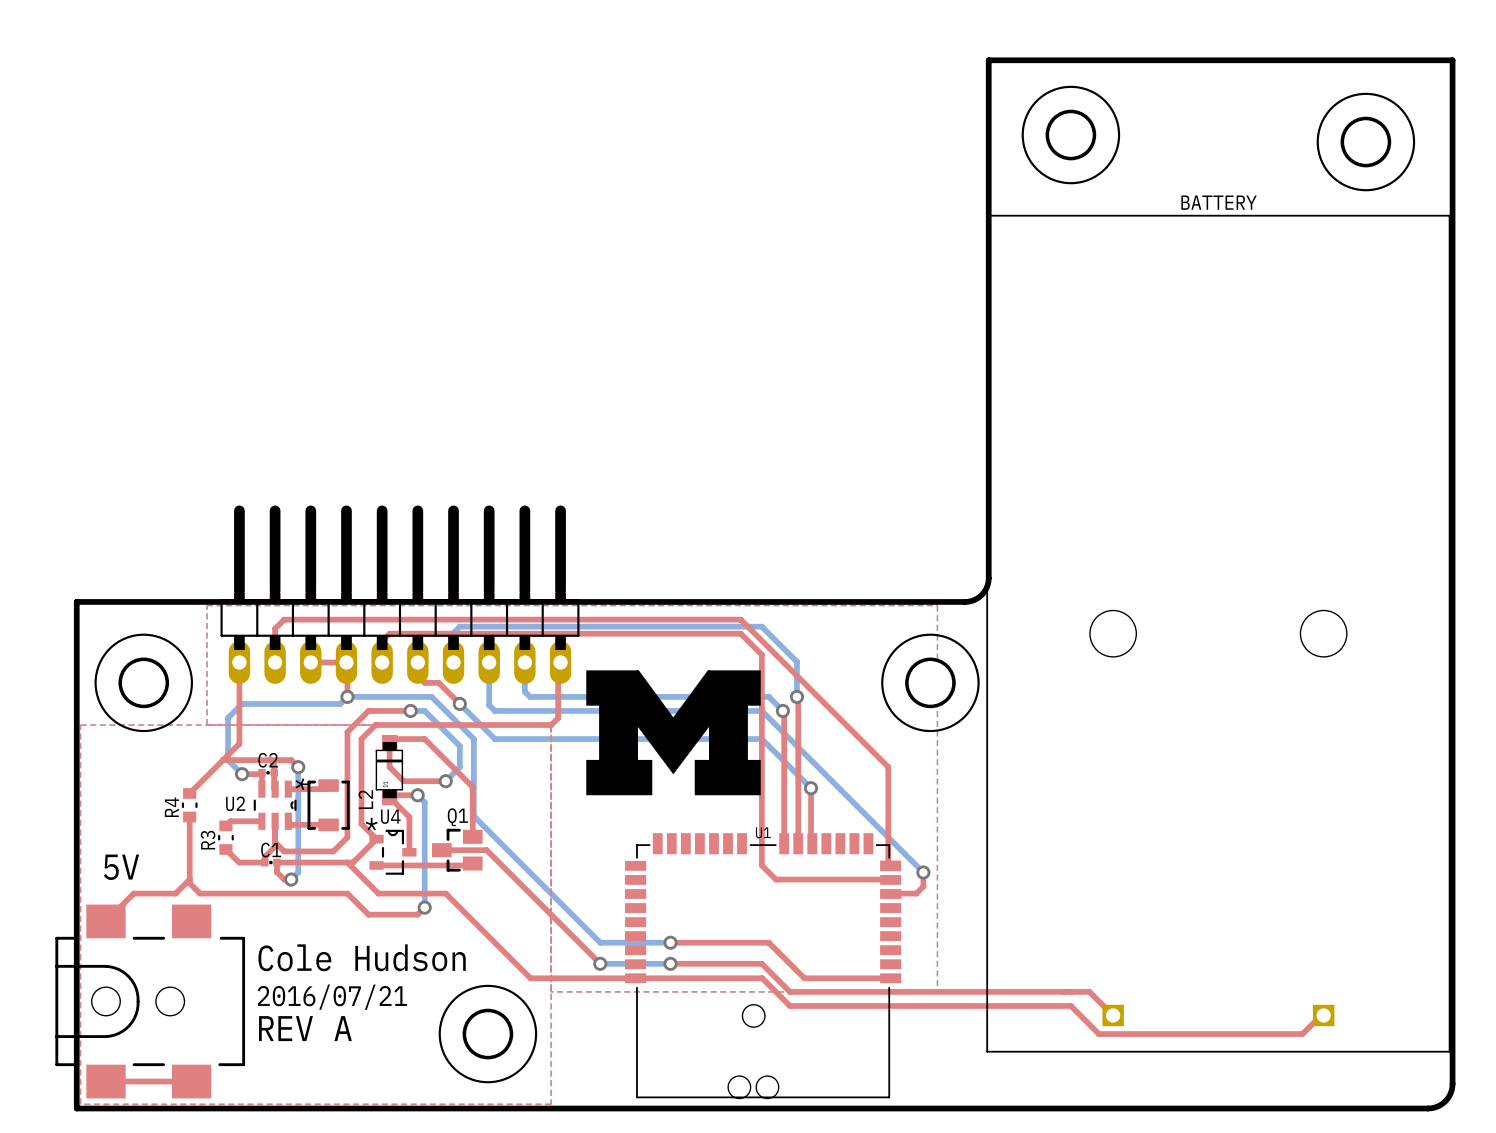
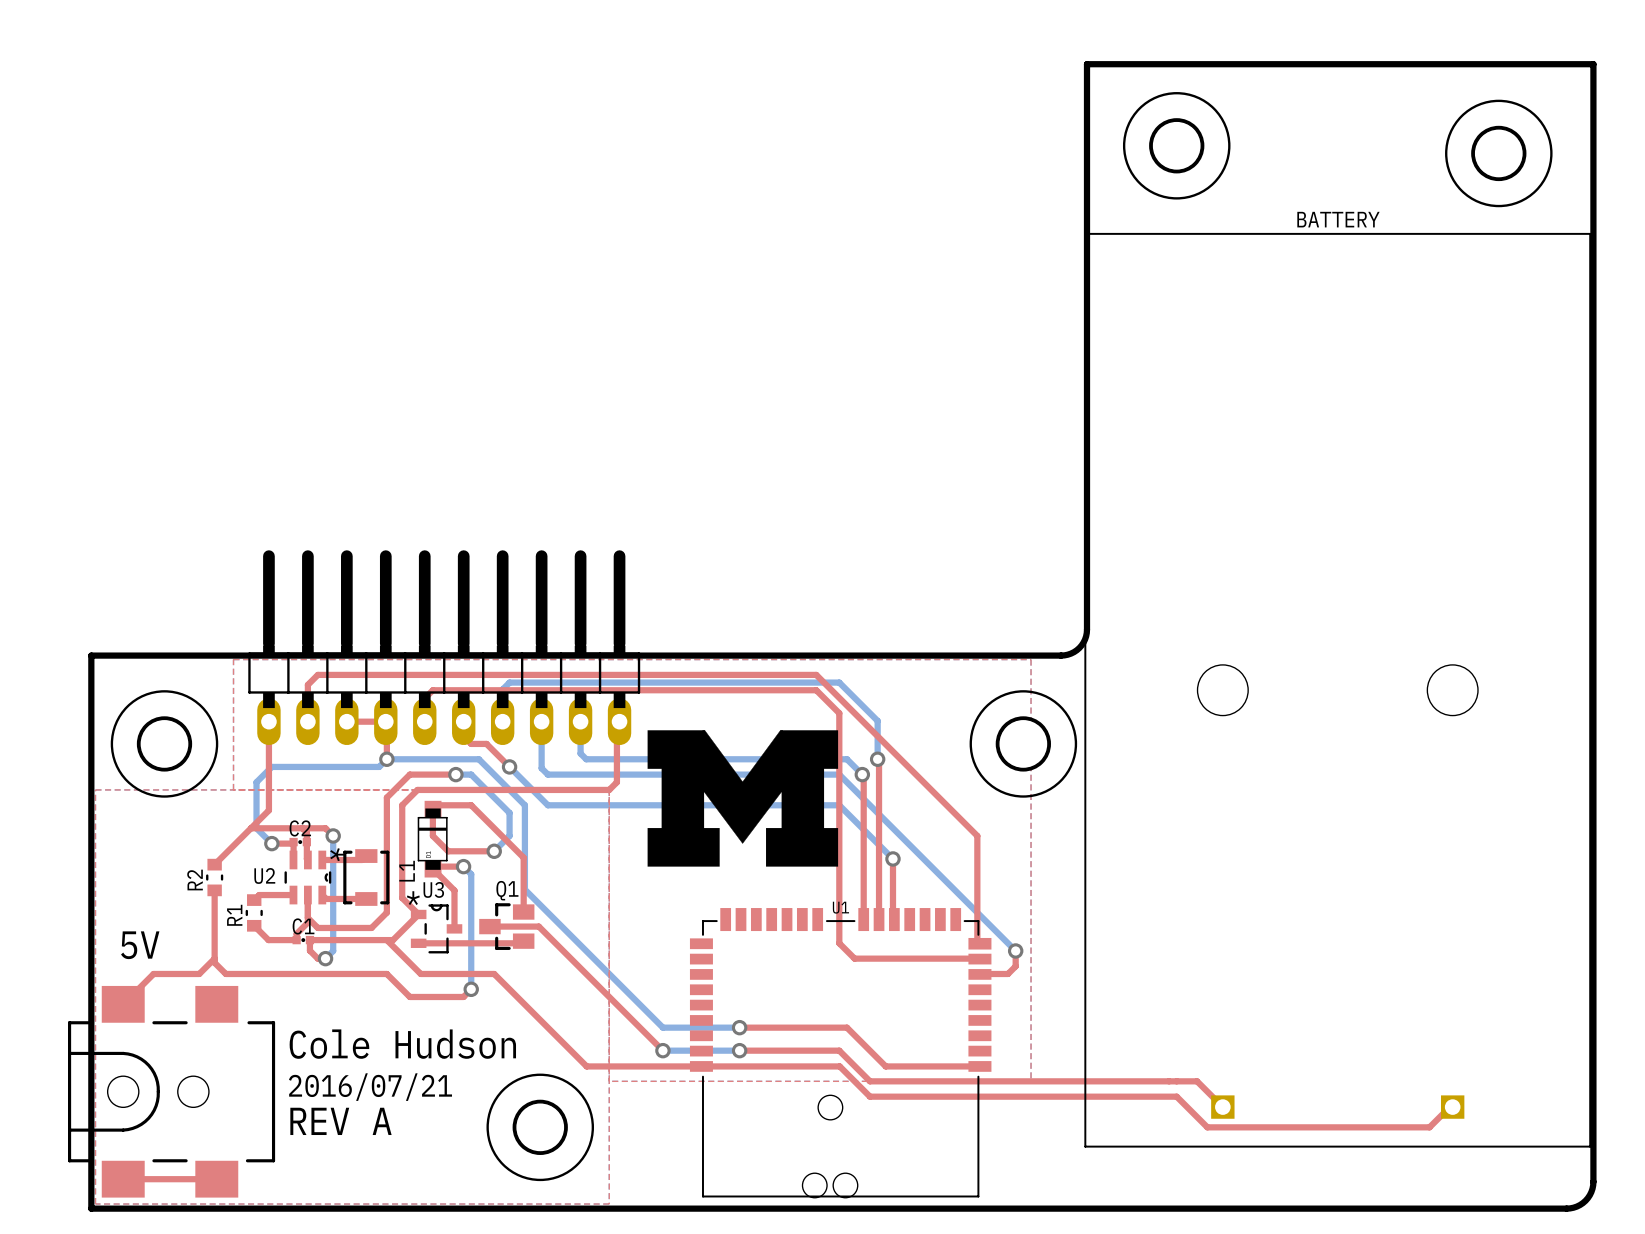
L2 name: L2 (365, 799) -> L1 (407, 871)
R4 name: R4 (171, 807) -> R2 (195, 880)
U4 name: U4 (390, 816) -> U3 (433, 889)
R3 name: R3 (208, 840) -> R1 (234, 915)

